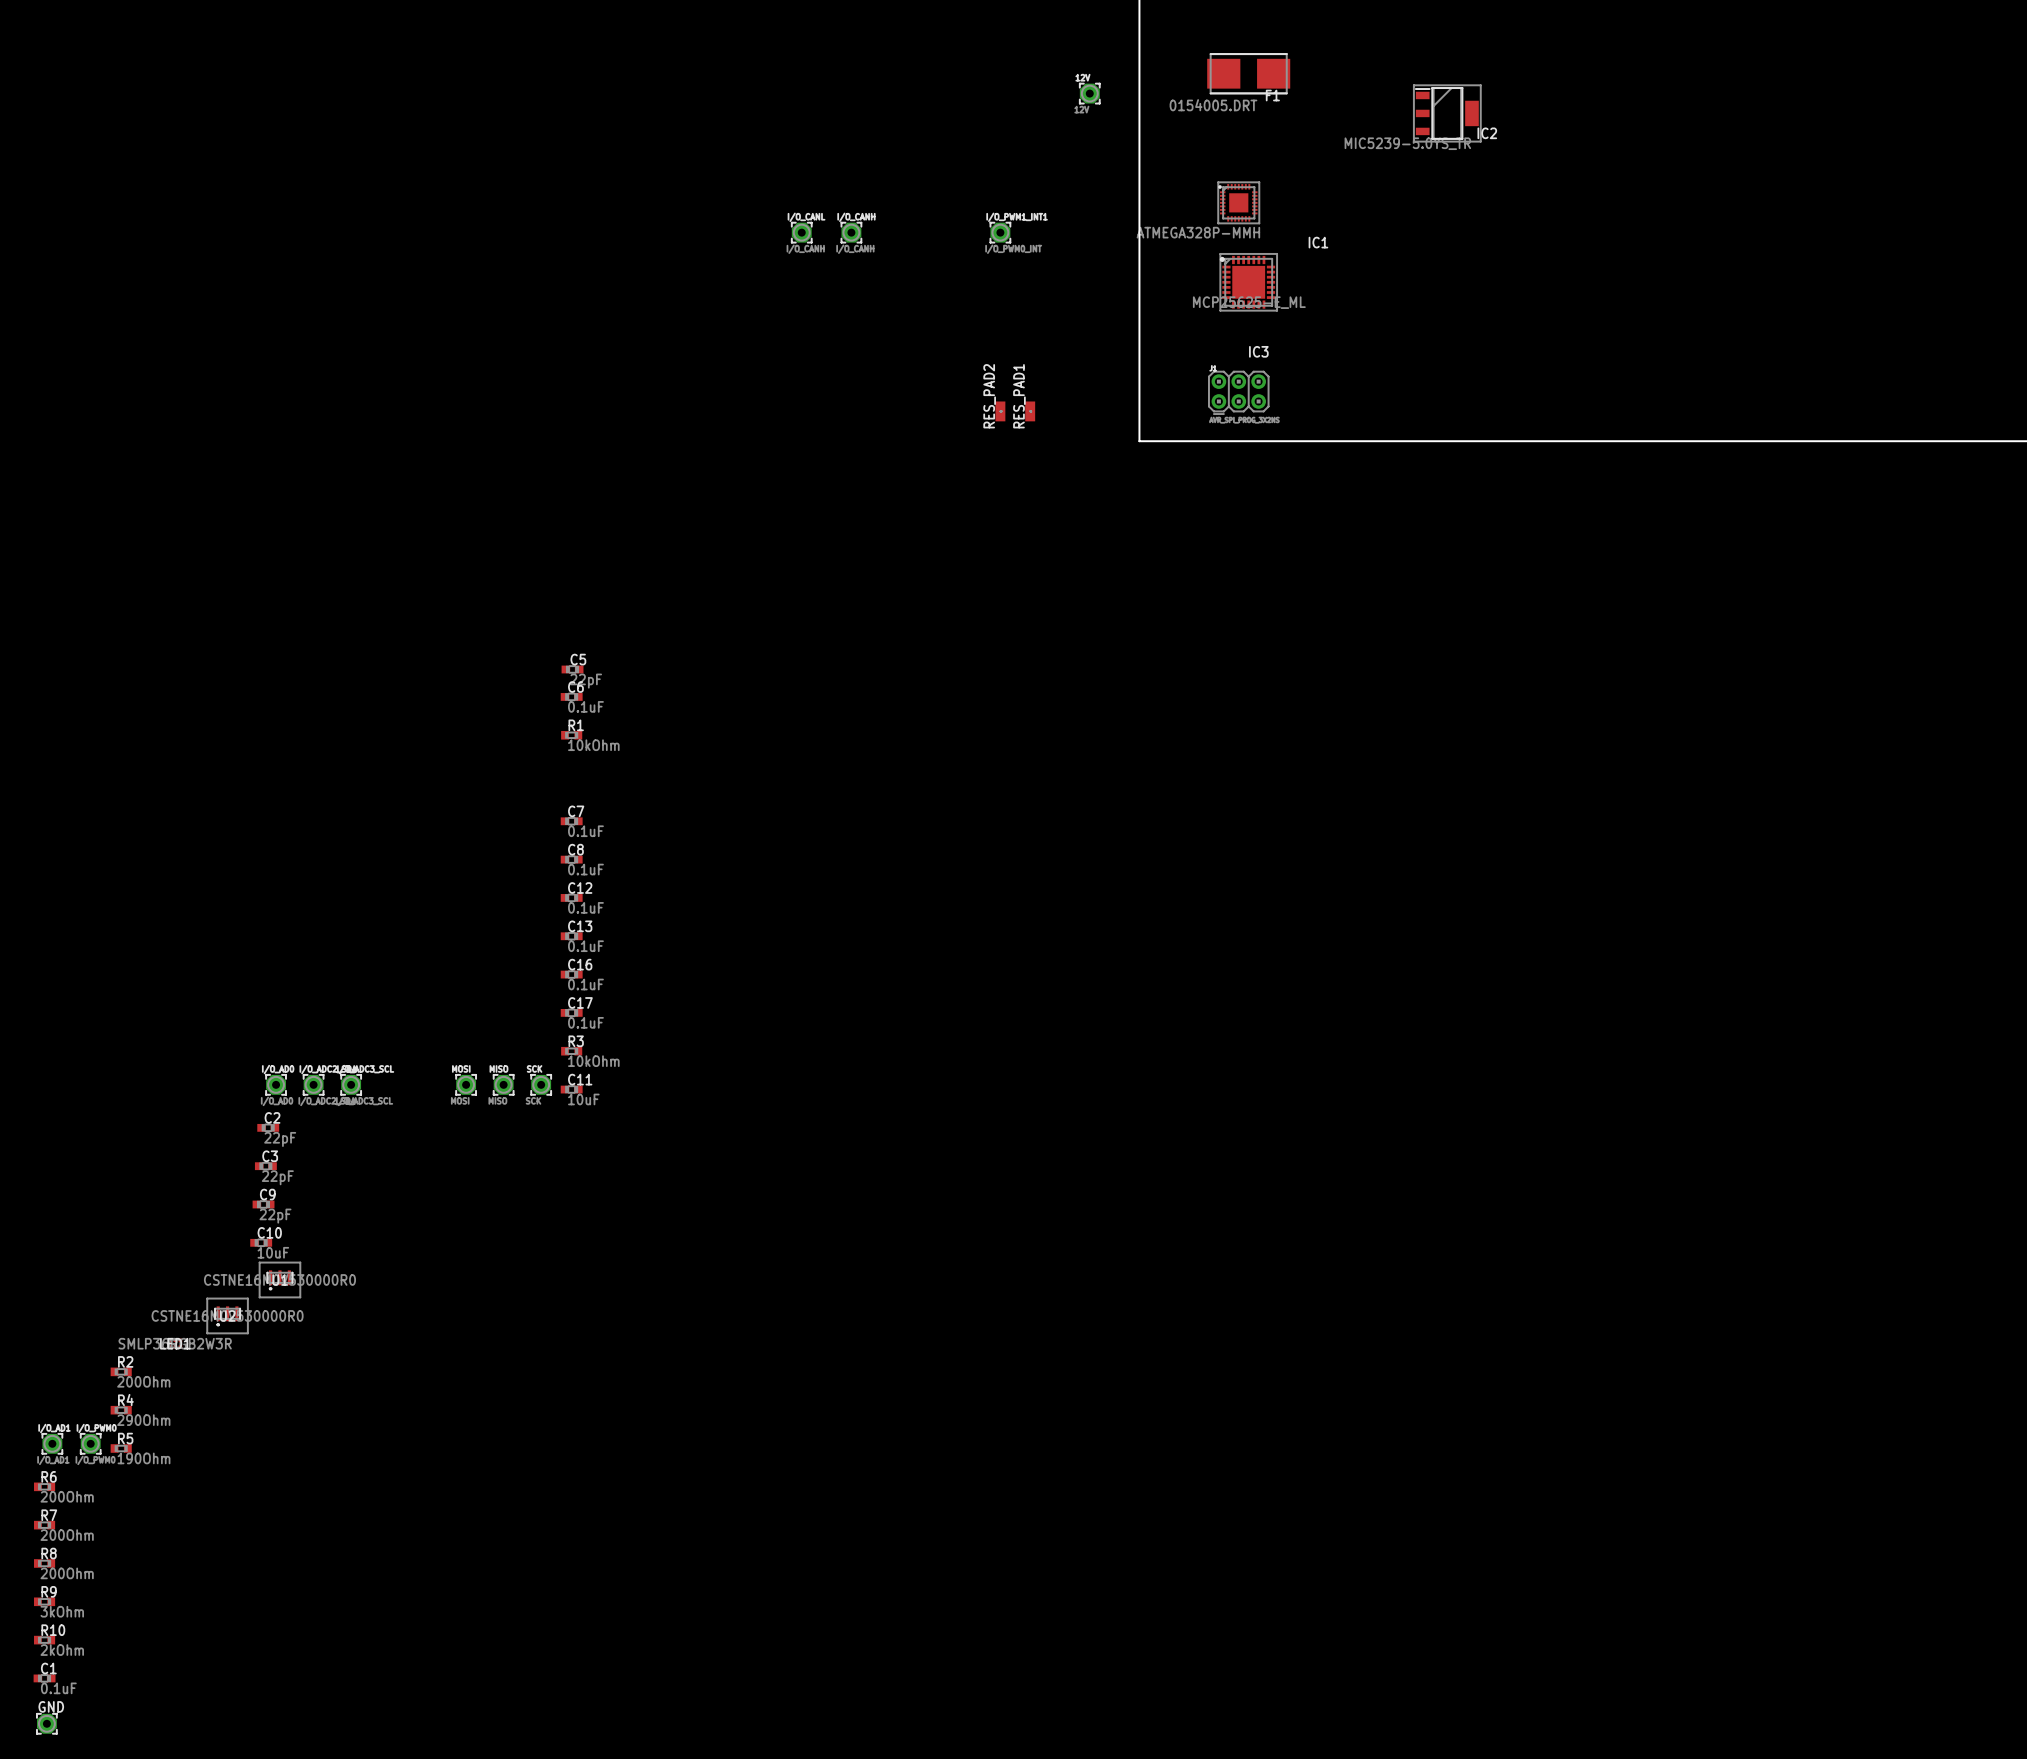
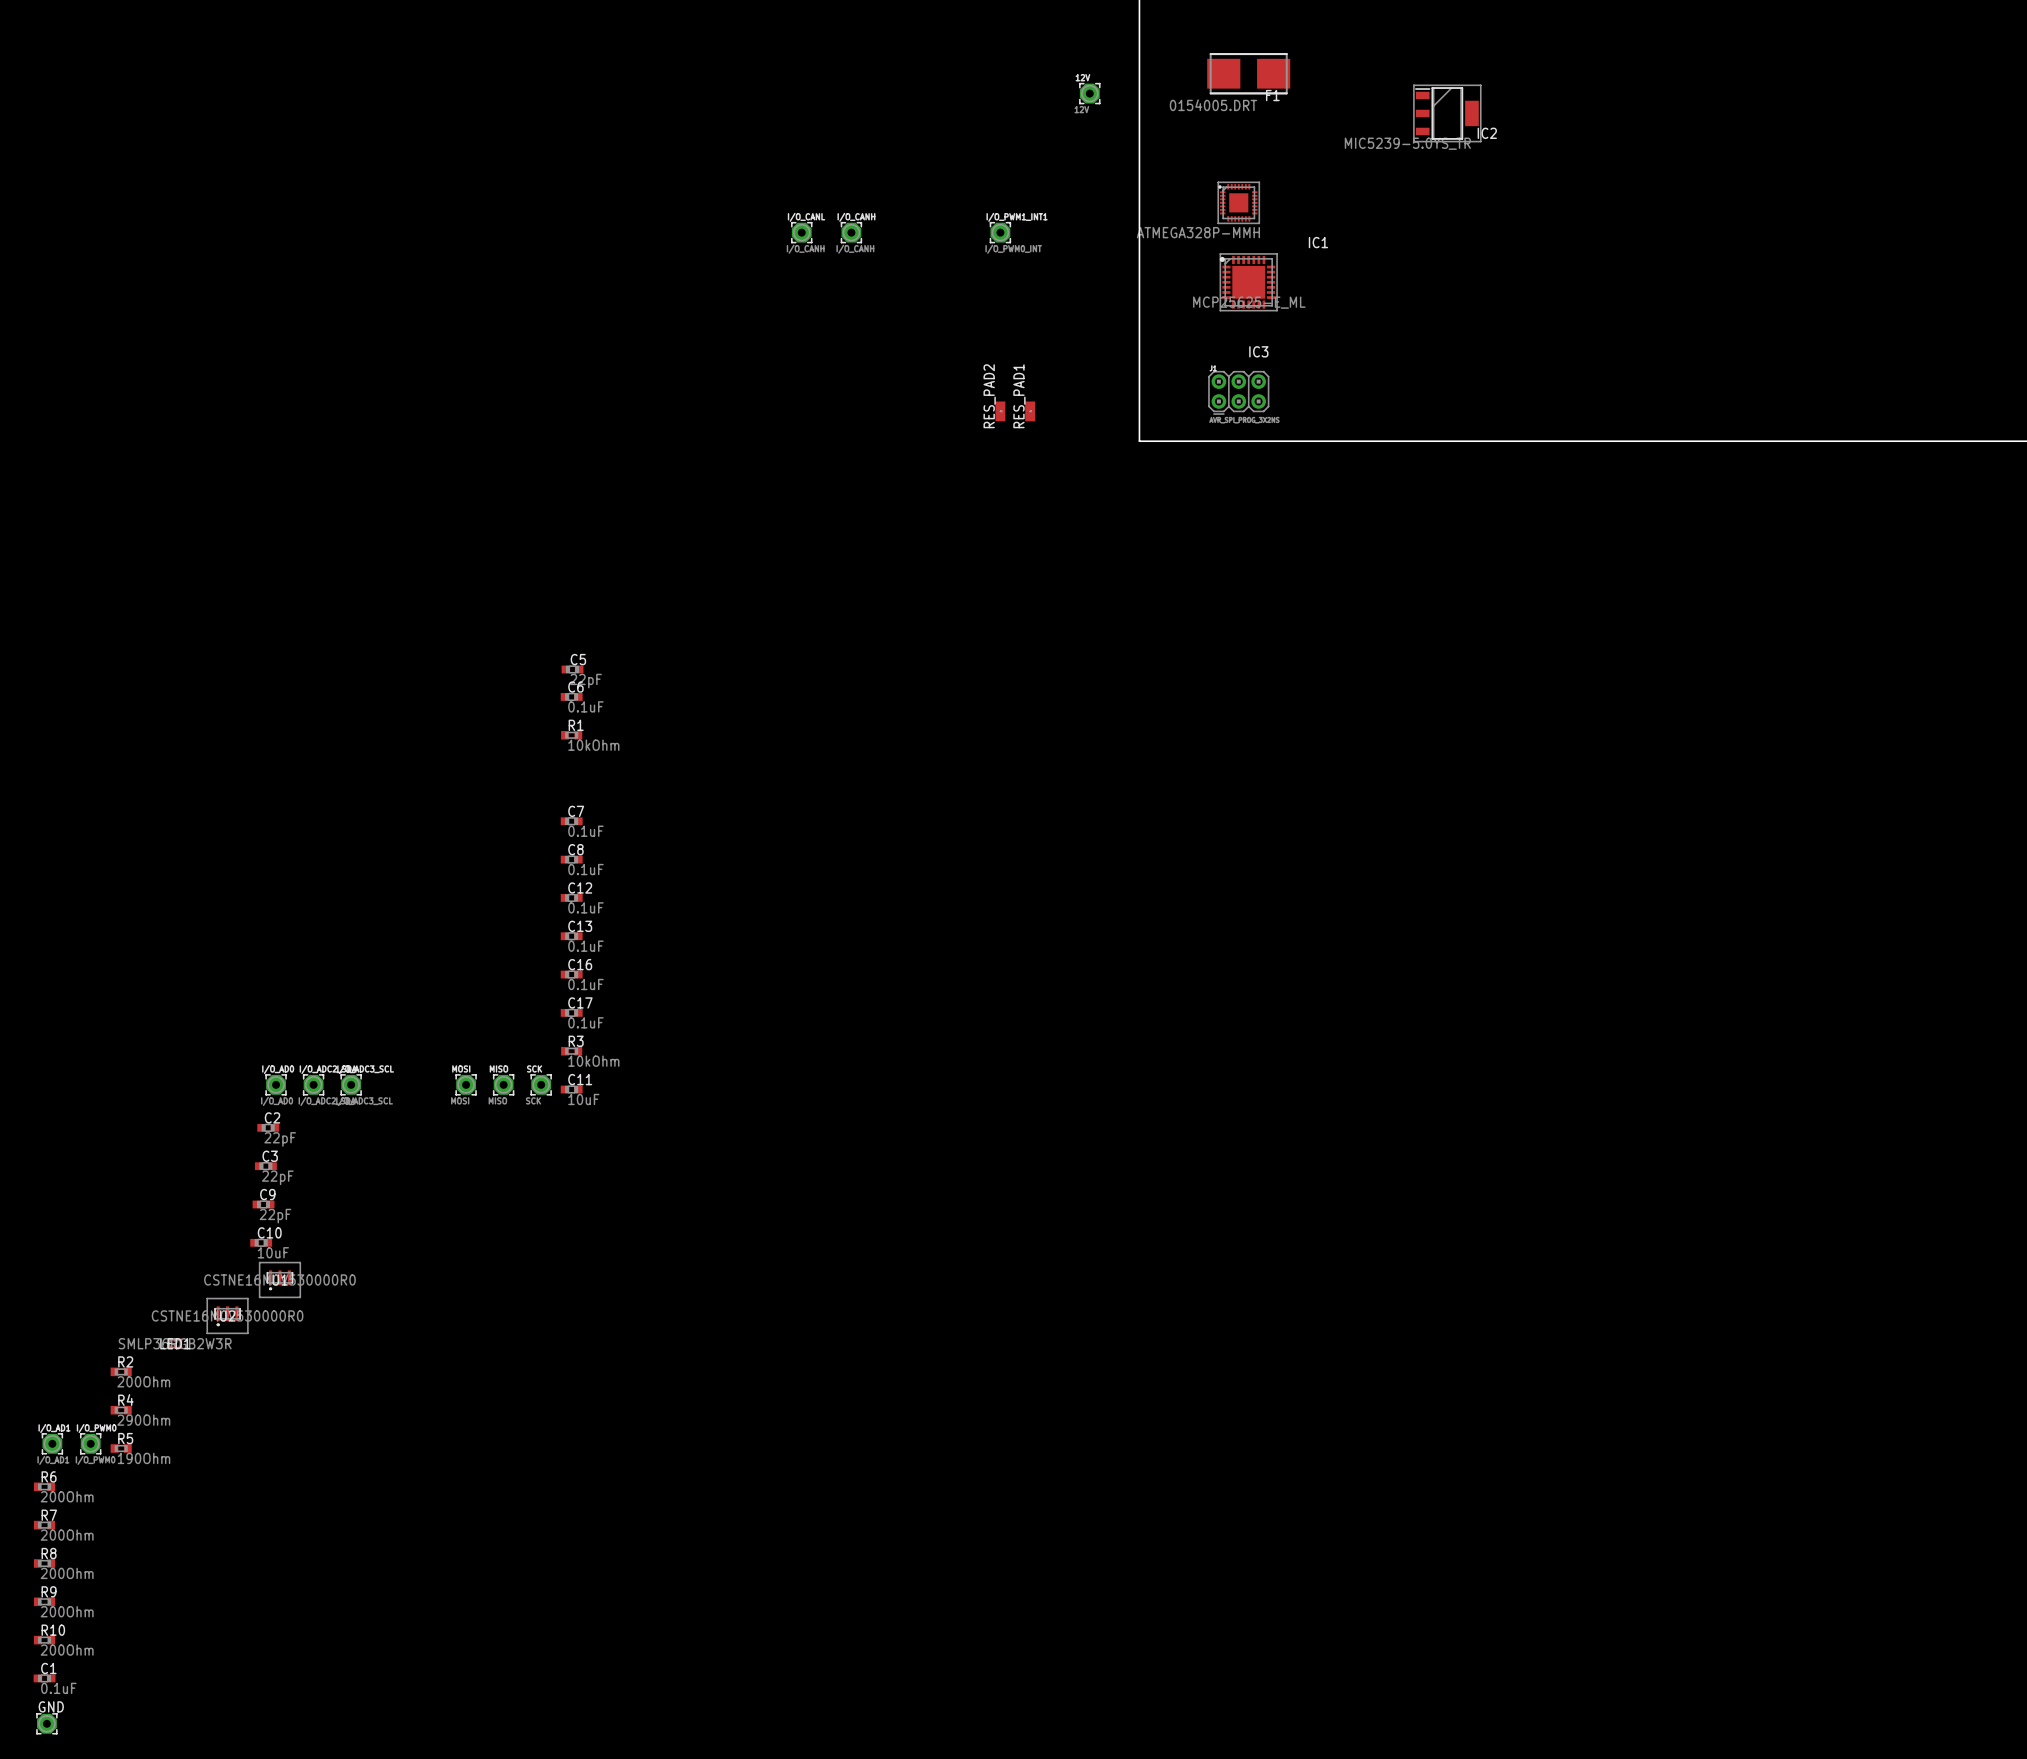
R9 value: 3kOhm (62, 1611) -> 200Ohm (67, 1611)
R10 value: 2kOhm (62, 1650) -> 200Ohm (67, 1650)

